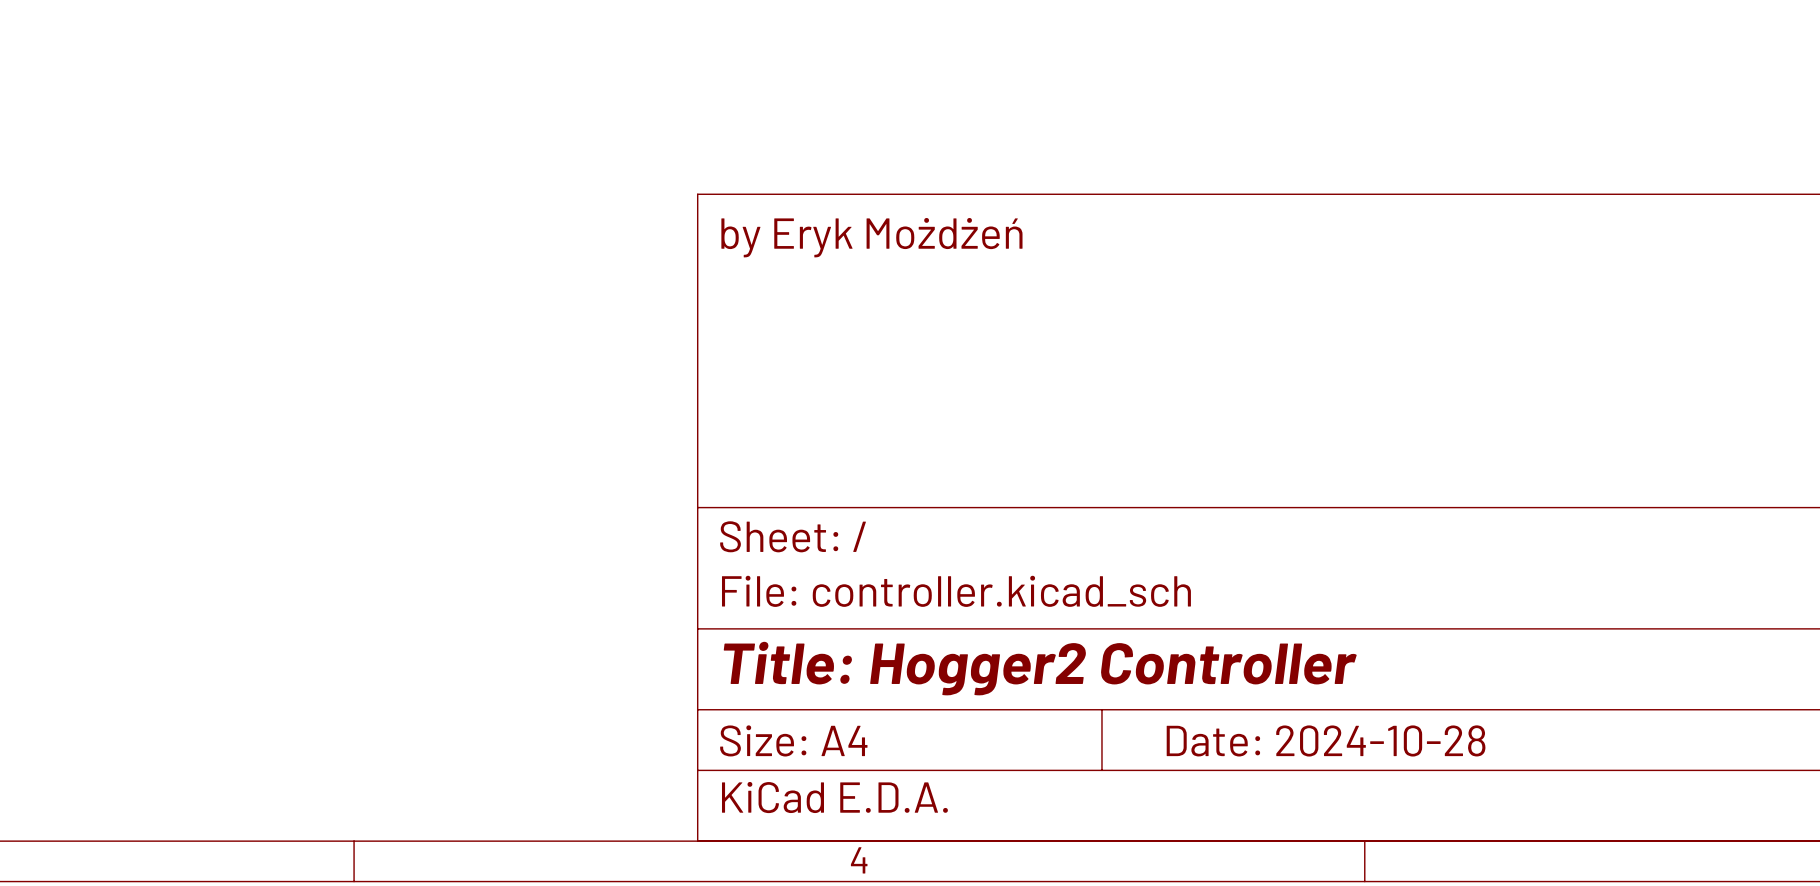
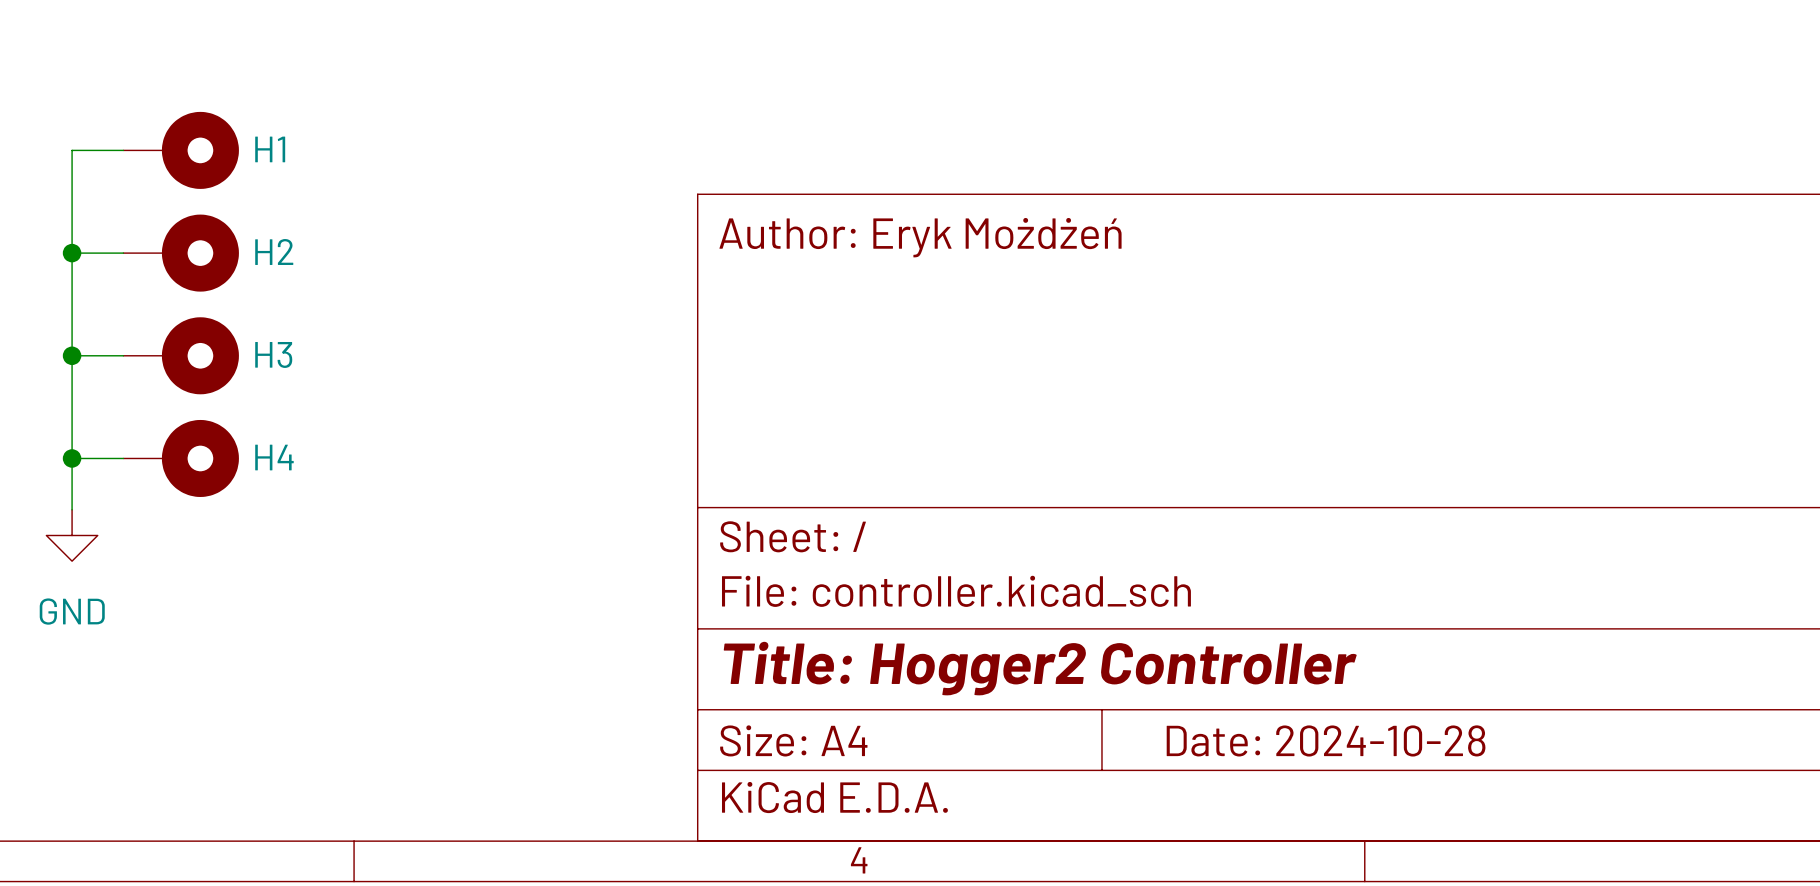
wire: none -> (123, 150) (72, 150) (72, 509)
H1: none -> (181, 150)
title block: by Eryk Możdżeń (871, 237) -> Author: Eryk Możdżeń (920, 237)
wire: none -> (72, 253) (123, 253)
junction: none -> (72, 253)
H2: none -> (181, 253)
wire: none -> (72, 355) (123, 355)
junction: none -> (72, 355)
H3: none -> (181, 355)
wire: none -> (72, 458) (123, 458)
junction: none -> (72, 458)
H4: none -> (181, 458)
power symbol: none -> GND (72, 535)

